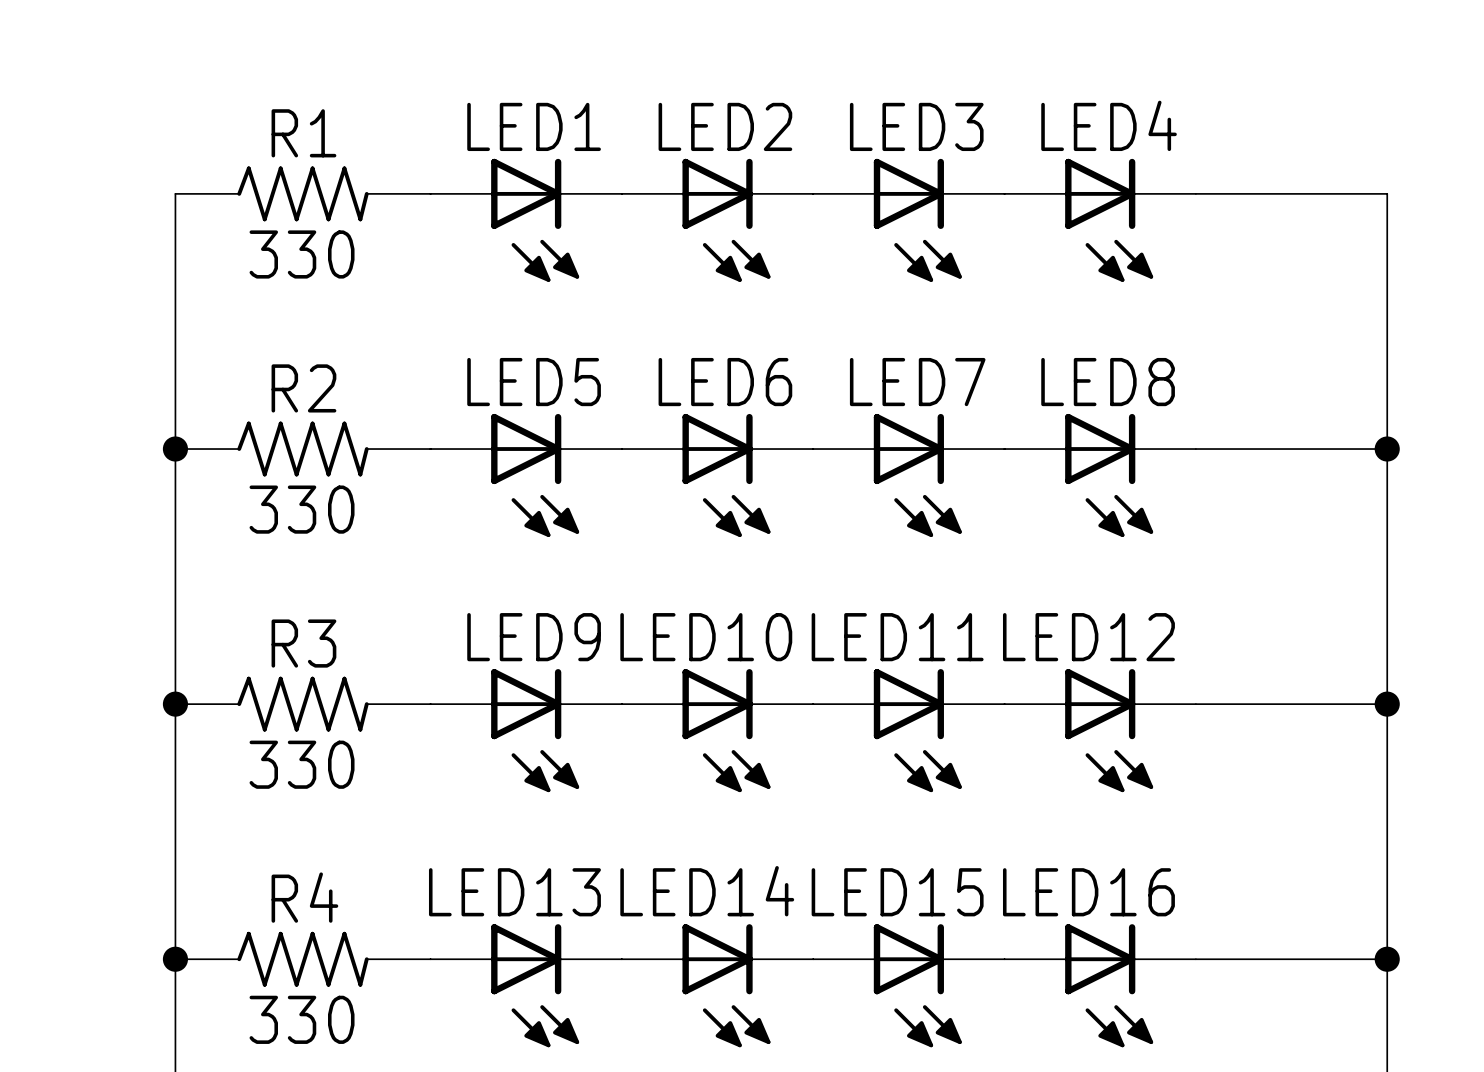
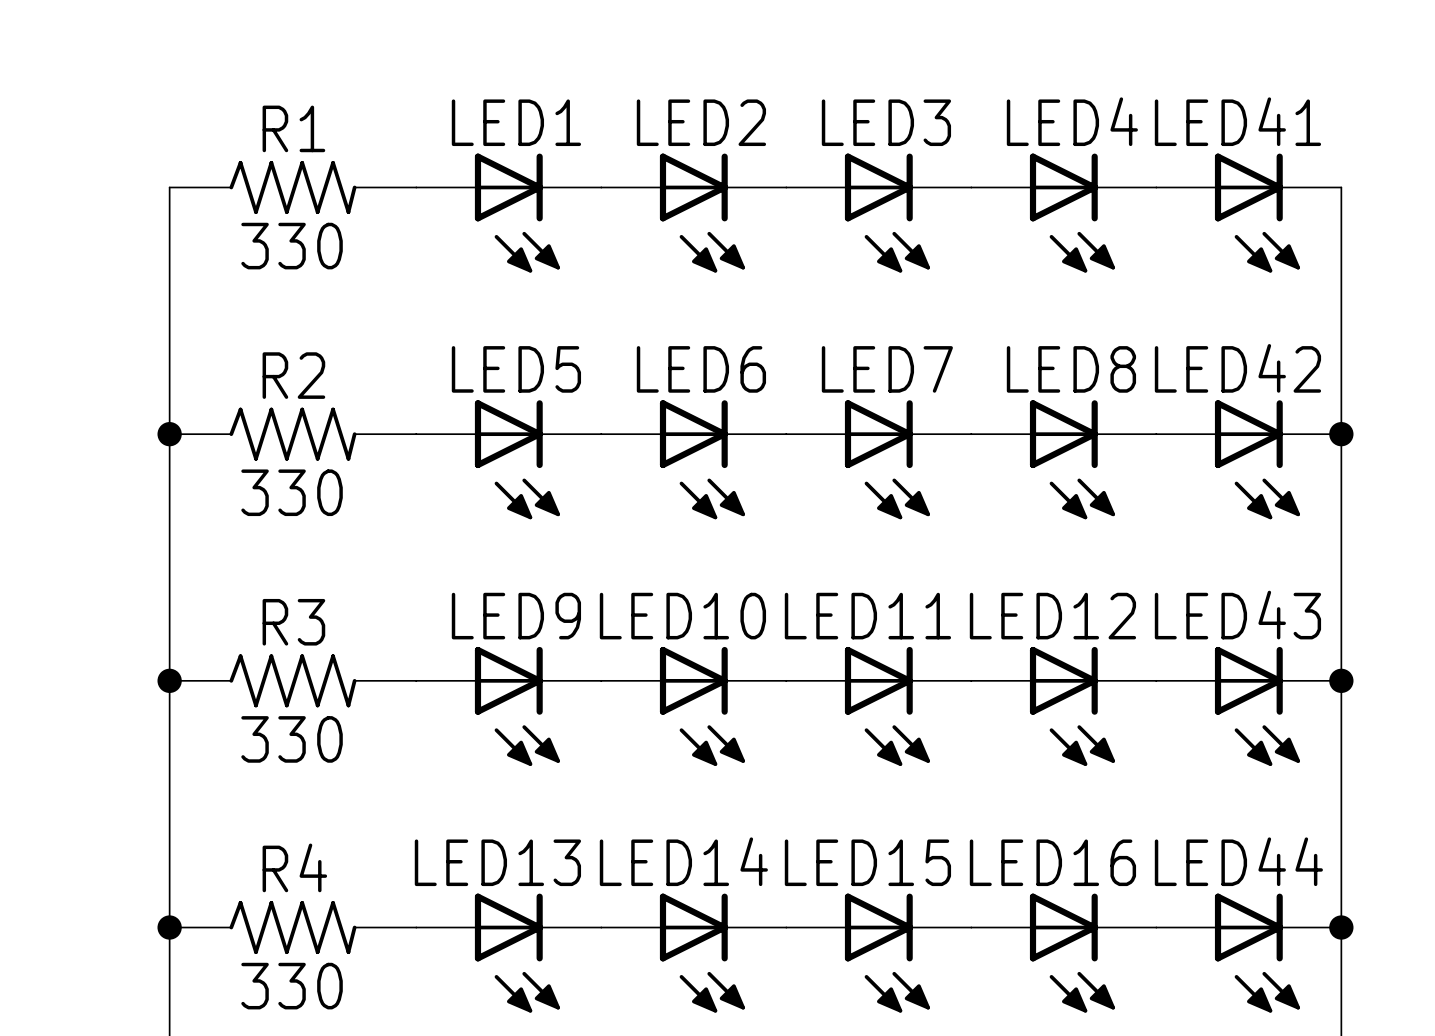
LED41: none -> (1248, 213)
LED42: none -> (1248, 459)
LED43: none -> (1248, 706)
LED44: none -> (1248, 953)

